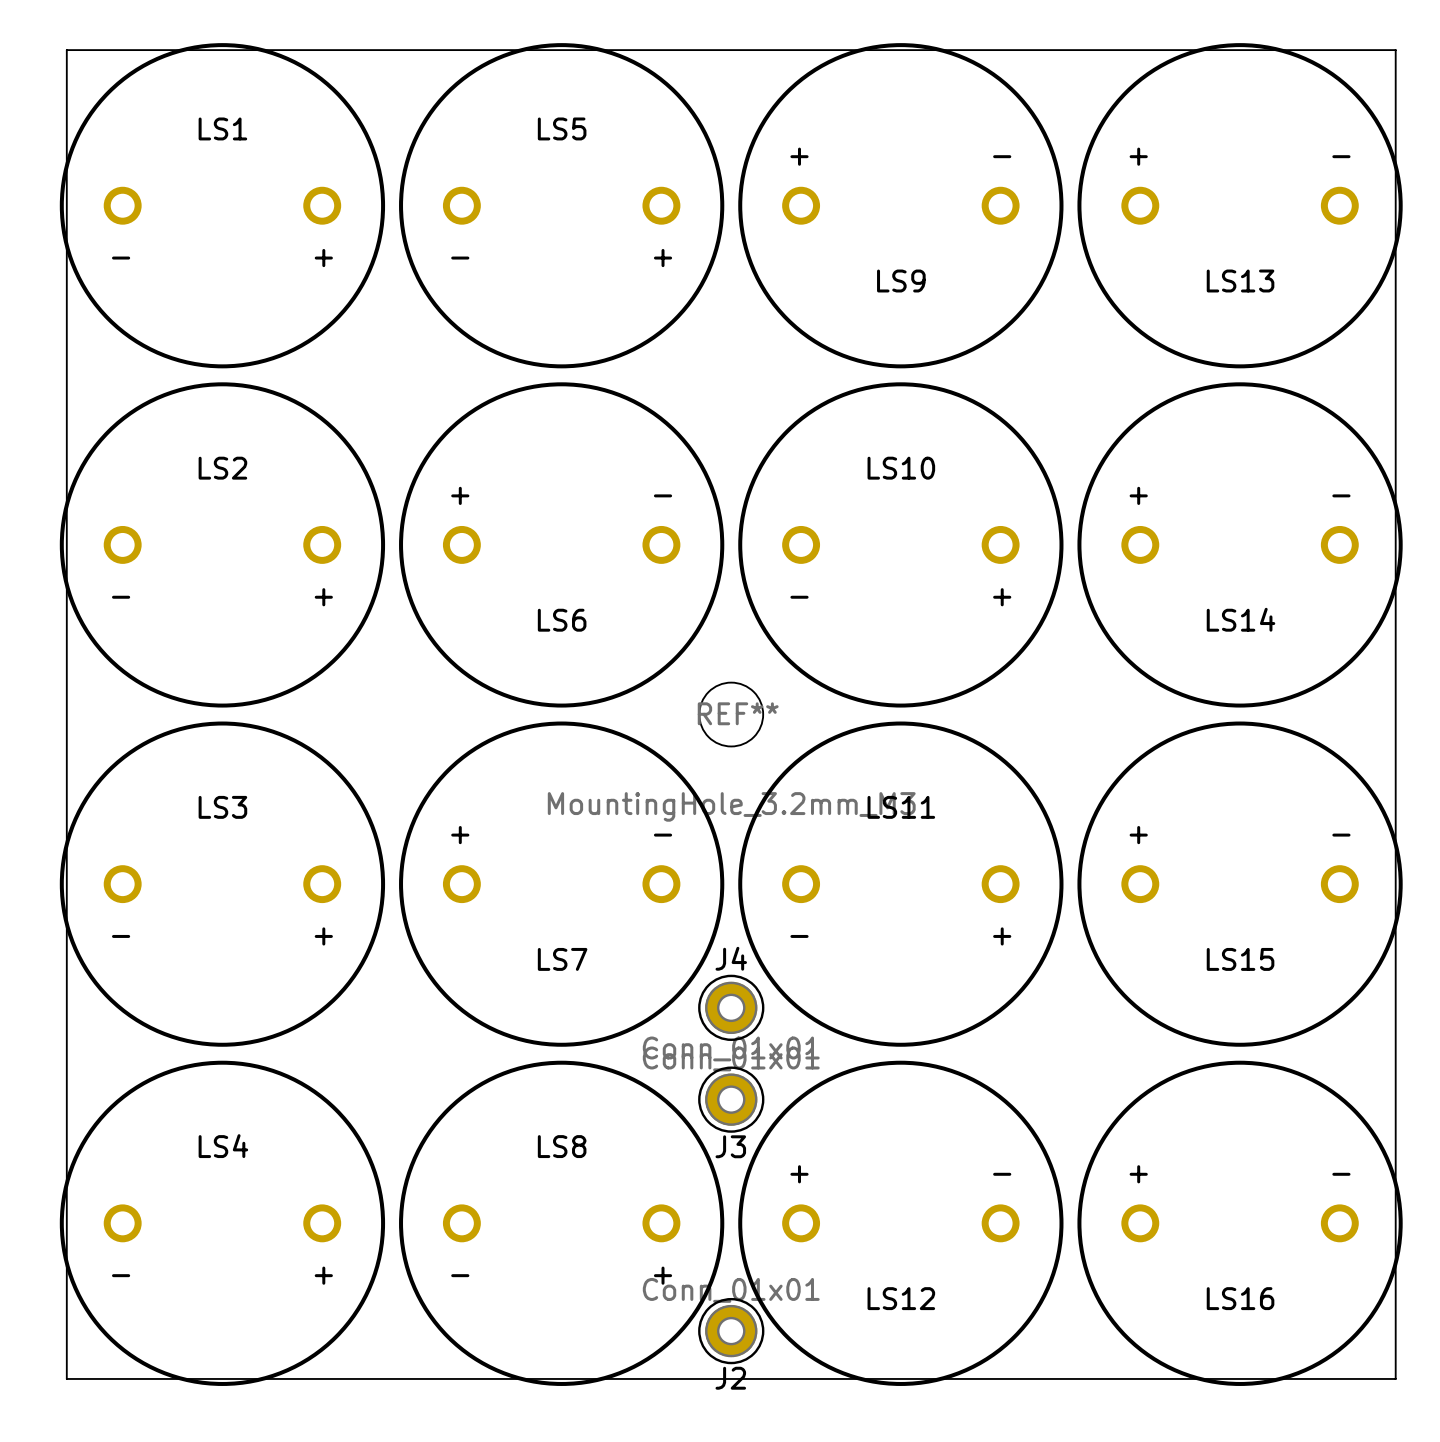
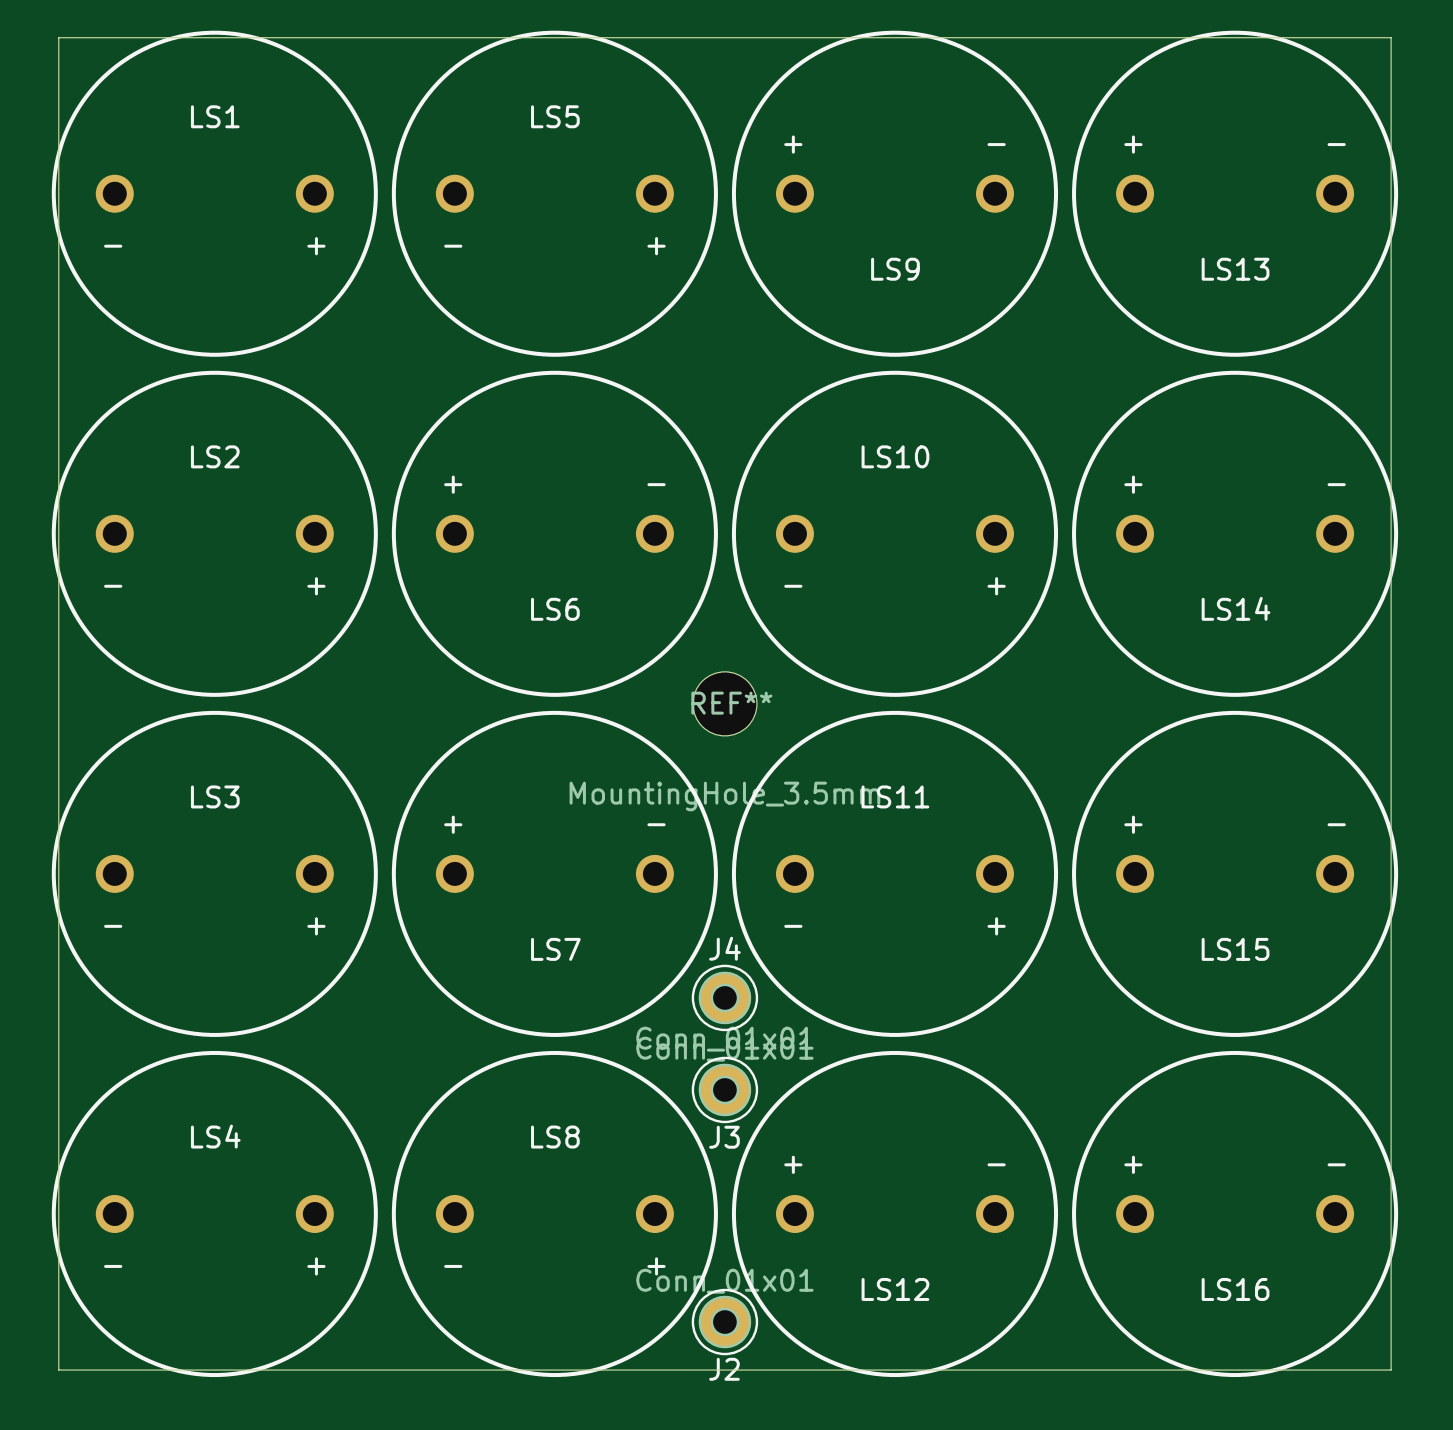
REF** value: MountingHole_3.2mm_M3 (731, 806) -> MountingHole_3.5mm (724, 796)

